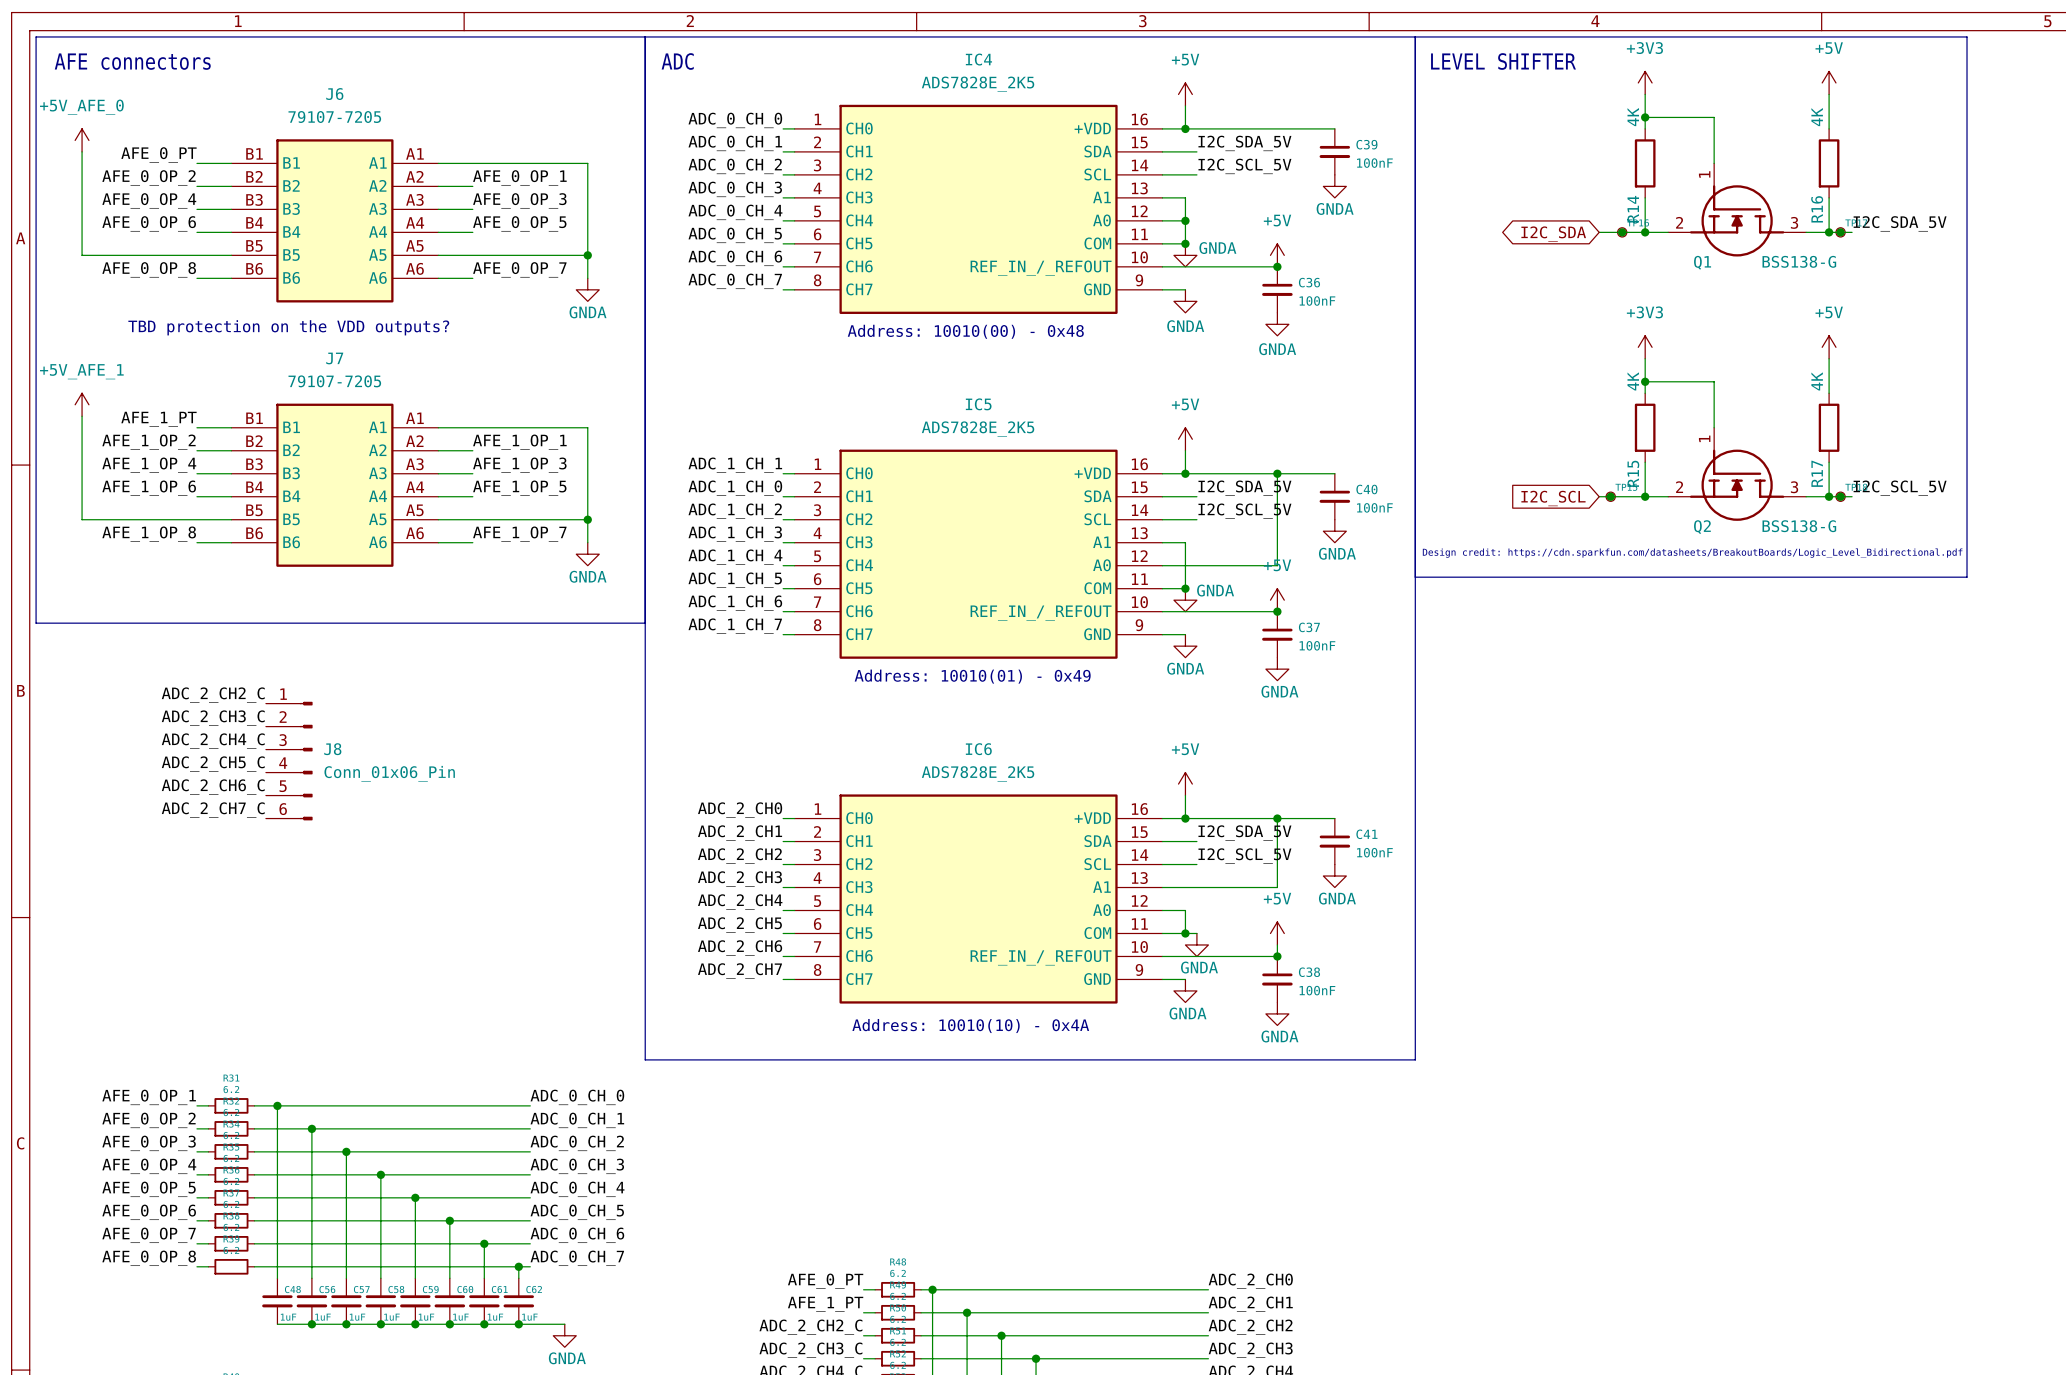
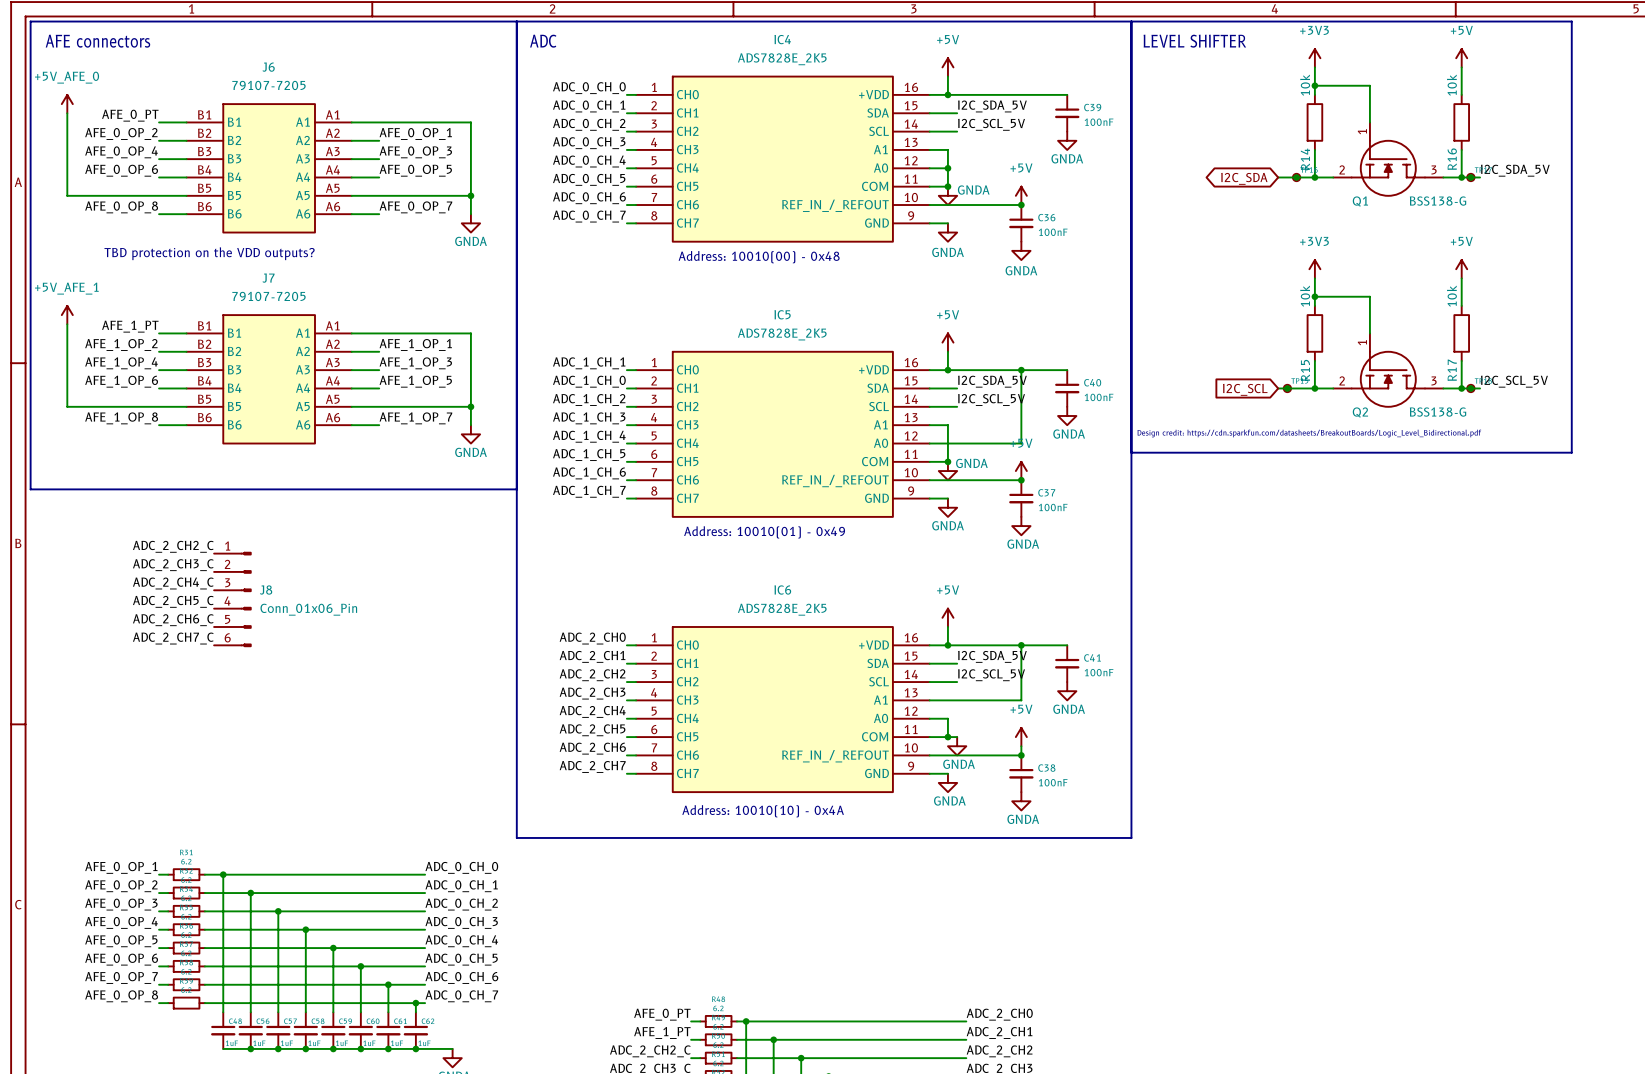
R14 value: 4K (1633, 117) -> 10k (1305, 85)
R16 value: 4K (1817, 117) -> 10k (1451, 85)
R15 value: 4K (1633, 381) -> 10k (1305, 296)
R17 value: 4K (1817, 381) -> 10k (1451, 296)

